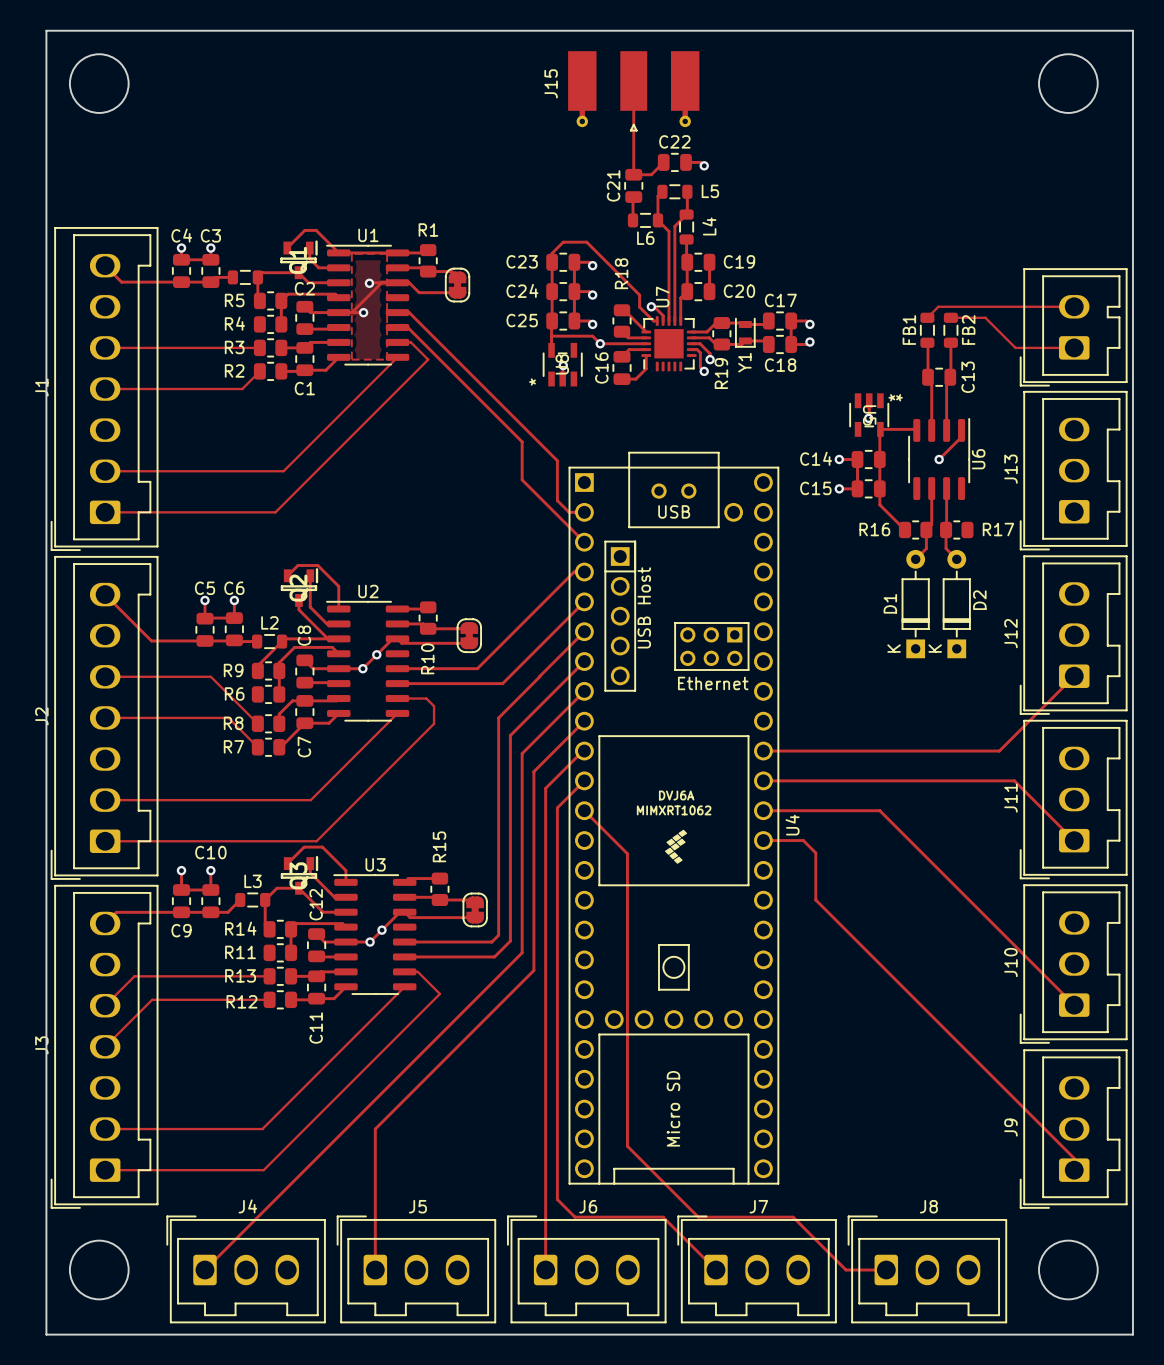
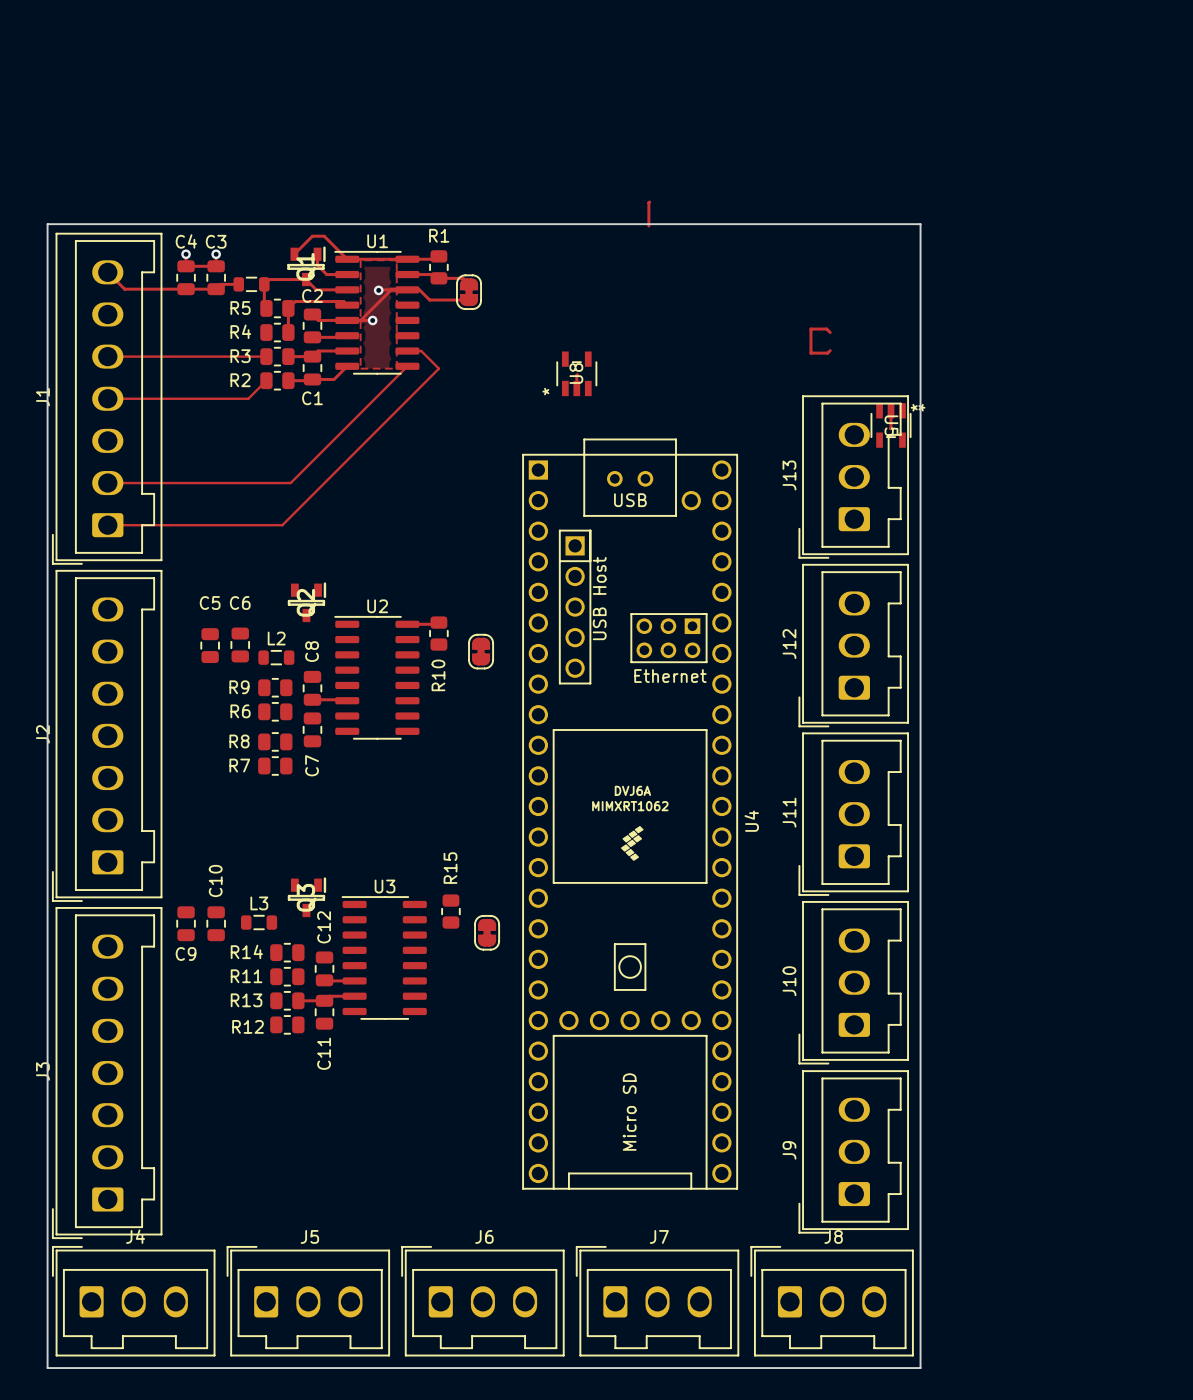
round board edge: [69, 53, 130, 114] -> none
round board edge: [1038, 53, 1099, 114] -> none
track: (633, 81) (633, 174) (651, 174) (663, 162) -> none
J15: (633, 91) -> none
C22: (674, 162) -> none
track: (686, 162) (700, 162) (704, 165) -> none
via: (704, 165) -> none
C21: (633, 185) -> none
track: (662, 191) (657, 196) (657, 220) (668, 231) (668, 320) -> none
L5: (674, 191) -> none
track: (687, 191) (687, 213) (674, 226) (674, 320) -> none
board edge: (46, 218) (46, 30) (1132, 30) (1132, 1334) (898, 1334) -> (47, 224) (920, 224) (920, 1368)
L6: (645, 220) -> none
L4: (686, 227) -> none
track: (686, 239) (687, 291) (680, 298) (680, 320) -> none
C23: (563, 262) -> none
C19: (698, 262) -> none
track: (709, 262) (709, 291) -> none
track: (592, 265) (589, 262) (574, 262) (574, 320) (589, 320) (592, 324) -> none
via: (592, 265) -> none
C24: (563, 291) -> none
track: (574, 291) (589, 291) (592, 295) -> none
C20: (698, 291) -> none
via: (592, 295) -> none
track: (651, 306) (654, 306) (663, 315) (663, 320) -> none
via: (651, 306) -> none
track: (1074, 306) (938, 306) (927, 317) -> none
track: (622, 310) (624, 310) (646, 332) -> none
track: (397, 312) (409, 312) (557, 460) (557, 500) (569, 512) (584, 512) -> none
track: (950, 317) (985, 317) (1015, 347) (1074, 347) -> none
C25: (563, 320) -> none
R18: (622, 320) -> none
track: (657, 320) (653, 320) (639, 307) (639, 295) (586, 242) (563, 242) (552, 253) (551, 350) -> none
track: (768, 320) (765, 324) (715, 323) (707, 332) (691, 332) -> none
C17: (779, 320) -> none
via: (592, 324) -> none
via: (809, 324) -> none
track: (397, 327) (407, 327) (522, 441) (522, 479) (584, 542) -> none
part: (1073, 327) -> none
FB1: (927, 330) -> none
FB2: (950, 330) -> none
track: (622, 331) (628, 337) (646, 337) -> none
Y1: (745, 332) -> none
R19: (721, 333) -> none
track: (551, 336) (592, 336) (600, 343) (646, 343) -> none
track: (691, 337) (709, 337) (715, 344) (741, 344) (745, 340) (765, 340) (768, 344) -> none
via: (809, 342) -> none
track: (927, 342) (928, 377) (931, 380) (931, 430) -> none
track: (950, 342) (950, 376) (946, 380) (946, 430) -> none
via: (600, 343) -> none
U7: (668, 343) -> none
track: (691, 343) (700, 343) (710, 353) (710, 359) -> none
C18: (779, 344) -> none
track: (646, 349) (629, 349) (622, 356) -> none
track: (691, 349) (697, 349) (700, 352) (700, 367) (704, 371) -> none
track: (646, 355) (646, 368) (635, 379) (622, 379) -> none
via: (710, 359) -> none
via: (563, 365) -> none
C16: (622, 367) -> none
via: (704, 371) -> none
C13: (939, 377) -> none
via: (868, 418) -> none
track: (916, 430) (879, 429) (879, 504) (904, 529) -> none
track: (961, 430) (961, 437) (939, 459) -> none
track: (839, 459) (857, 459) (857, 488) (839, 488) -> none
via: (839, 459) -> none
C14: (868, 459) -> none
U6: (939, 459) -> none
via: (939, 459) -> none
J13 position: (1073, 470) -> (853, 477)
via: (839, 488) -> none
C15: (868, 488) -> none
track: (931, 488) (931, 524) (926, 529) (926, 548) (915, 559) -> none
track: (946, 488) (946, 548) (956, 559) -> none
R16: (915, 529) -> none
R17: (956, 529) -> none
track: (584, 572) (574, 572) (477, 668) (397, 668) -> none
track: (287, 575) (297, 565) (317, 565) (338, 586) (338, 609) -> none
track: (310, 575) (310, 607) (327, 623) (338, 623) -> none
track: (105, 594) (151, 640) (257, 641) -> none
track: (205, 600) (205, 618) (234, 618) (234, 600) -> none
via: (205, 600) -> none
via: (234, 600) -> none
track: (298, 600) (298, 609) (327, 638) -> none
track: (584, 601) (502, 683) (397, 683) -> none
D1: (915, 604) -> none
D2: (956, 604) -> none
track: (397, 623) (423, 623) (428, 628) (469, 628) -> none
track: (584, 631) (498, 717) (498, 935) (491, 942) (404, 942) -> none
J12 position: (1073, 635) -> (853, 645)
track: (338, 638) (284, 638) (257, 665) (257, 670) -> none
track: (469, 643) (401, 643) (397, 638) (392, 638) (362, 668) (313, 668) (304, 660) -> none
track: (338, 653) (332, 647) (294, 647) (279, 662) (279, 694) -> none
via: (376, 654) -> none
track: (584, 661) (510, 735) (510, 941) (494, 956) (404, 956) -> none
via: (362, 668) -> none
track: (105, 676) (210, 676) (257, 723) -> none
track: (1074, 676) (999, 751) (763, 751) -> none
track: (584, 691) (522, 753) (522, 952) (205, 1270) -> none
track: (338, 698) (336, 700) (292, 700) (279, 714) (279, 723) -> none
track: (397, 698) (426, 698) (434, 706) (434, 723) (316, 841) (105, 841) -> none
track: (338, 713) (329, 723) (304, 723) (279, 747) -> none
track: (397, 713) (310, 800) (105, 800) -> none
track: (105, 717) (228, 717) (257, 747) -> none
track: (584, 721) (533, 771) (533, 970) (375, 1129) (375, 1270) -> none
track: (584, 751) (545, 788) (545, 1270) -> none
track: (584, 780) (557, 807) (557, 1199) (575, 1217) (663, 1217) (715, 1270) -> none
track: (763, 780) (1014, 780) (1074, 840) -> none
J11 position: (1073, 799) -> (853, 814)
track: (584, 810) (627, 853) (627, 1146) (698, 1217) (793, 1217) (846, 1270) (886, 1270) -> none
track: (763, 810) (879, 810) (1074, 1005) -> none
U4 position: (673, 818) -> (630, 814)
track: (763, 840) (803, 840) (815, 853) (815, 899) (1074, 1158) (1074, 1170) -> none
C10 name rotation: 0° (210, 852) -> 90° counterclockwise (215, 880)
track: (287, 863) (304, 847) (322, 847) (345, 870) (345, 882) -> none
track: (310, 863) (310, 872) (334, 897) (345, 897) -> none
track: (181, 870) (181, 890) (210, 890) (210, 870) -> none
via: (181, 870) -> none
via: (210, 870) -> none
track: (439, 878) (408, 878) (404, 882) -> none
track: (404, 897) (437, 897) (439, 899) (472, 899) (475, 902) -> none
track: (240, 899) (227, 912) (116, 912) (105, 923) -> none
track: (345, 912) (322, 912) (298, 888) (276, 888) (265, 899) (265, 924) (269, 929) -> none
track: (475, 917) (410, 917) (404, 912) (399, 912) (370, 942) (324, 942) (316, 934) -> none
track: (345, 927) (342, 923) (296, 923) (291, 929) (291, 952) -> none
via: (381, 930) -> none
via: (370, 942) -> none
J10 position: (1073, 964) -> (853, 982)
track: (404, 971) (417, 971) (439, 993) (263, 1170) (105, 1170) -> none
track: (269, 976) (134, 976) (105, 1005) -> none
track: (345, 986) (334, 998) (291, 999) -> none
track: (404, 986) (262, 1129) (105, 1129) -> none
track: (269, 999) (152, 999) (105, 1046) -> none
J9 position: (1073, 1129) -> (853, 1151)
round board edge: [69, 1240, 130, 1300] -> none
round board edge: [1038, 1240, 1099, 1300] -> none
J4 position: (246, 1269) -> (133, 1301)
J5 position: (416, 1269) -> (308, 1301)
J6 position: (586, 1269) -> (482, 1301)
J7 position: (757, 1269) -> (657, 1301)
J8 position: (927, 1269) -> (832, 1301)

